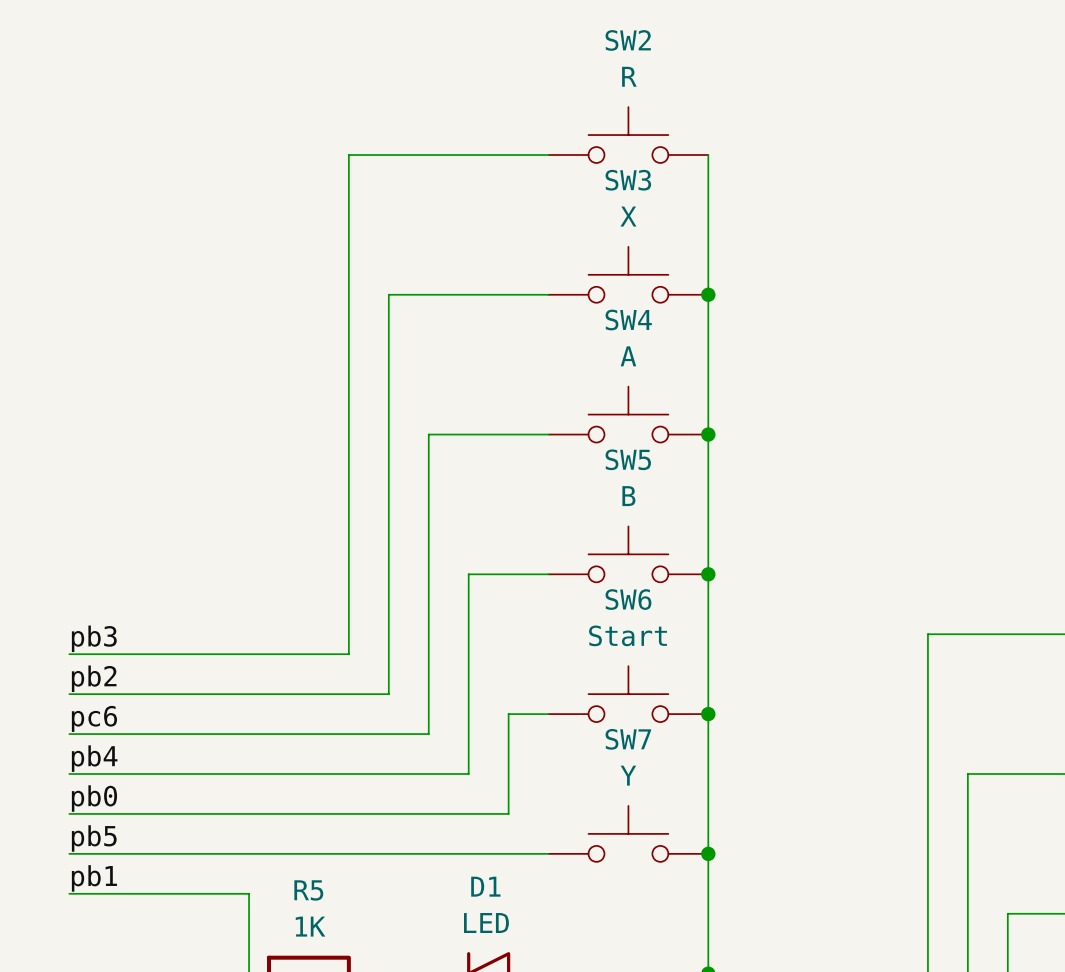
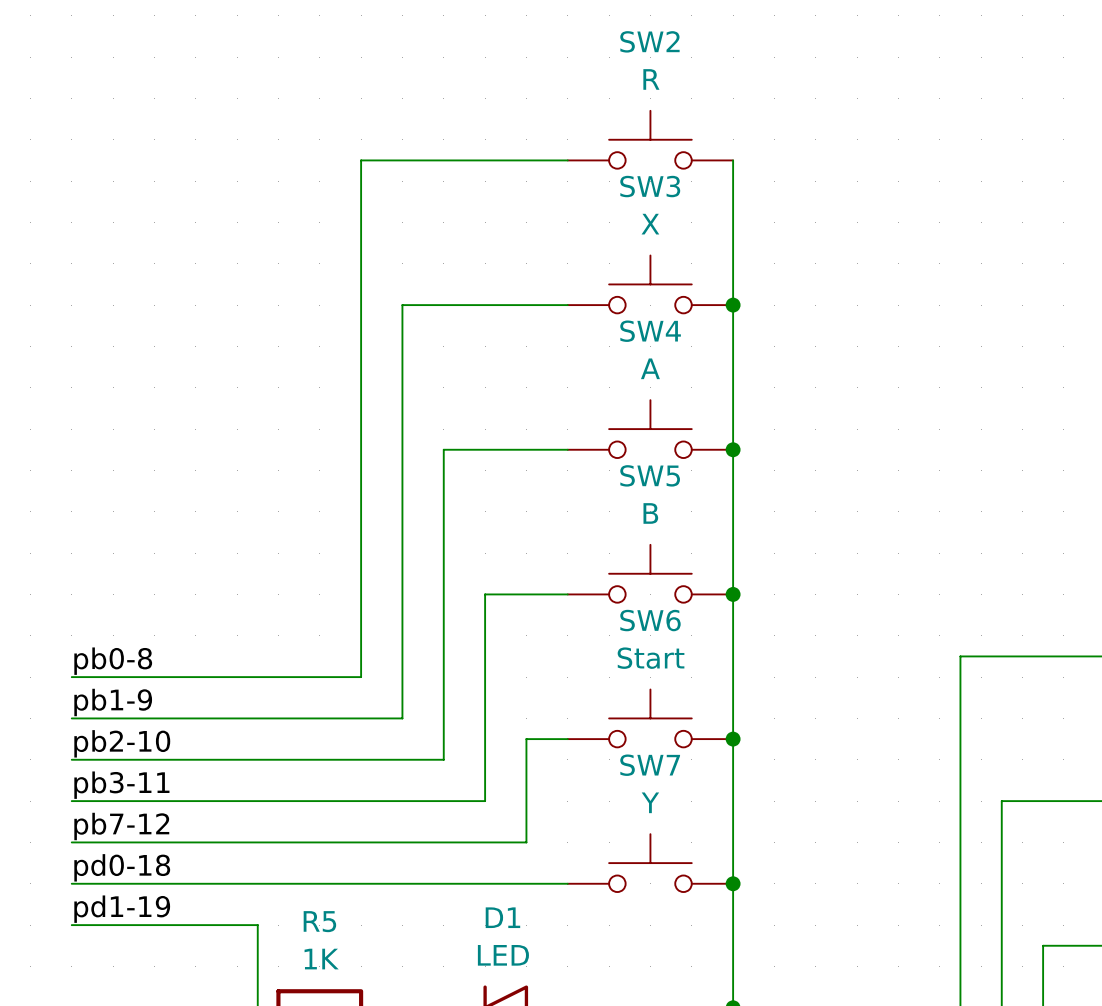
label: pb3 (94, 638) -> pb0-8 (113, 661)
label: pb2 (94, 678) -> pb1-9 (113, 702)
label: pc6 (94, 718) -> pb2-10 (122, 743)
label: pb4 (94, 758) -> pb3-11 (121, 785)
label: pb0 (94, 798) -> pb7-12 (121, 826)
label: pb5 (94, 838) -> pd0-18 (122, 867)
label: pb1 (94, 878) -> pd1-19 (122, 909)

